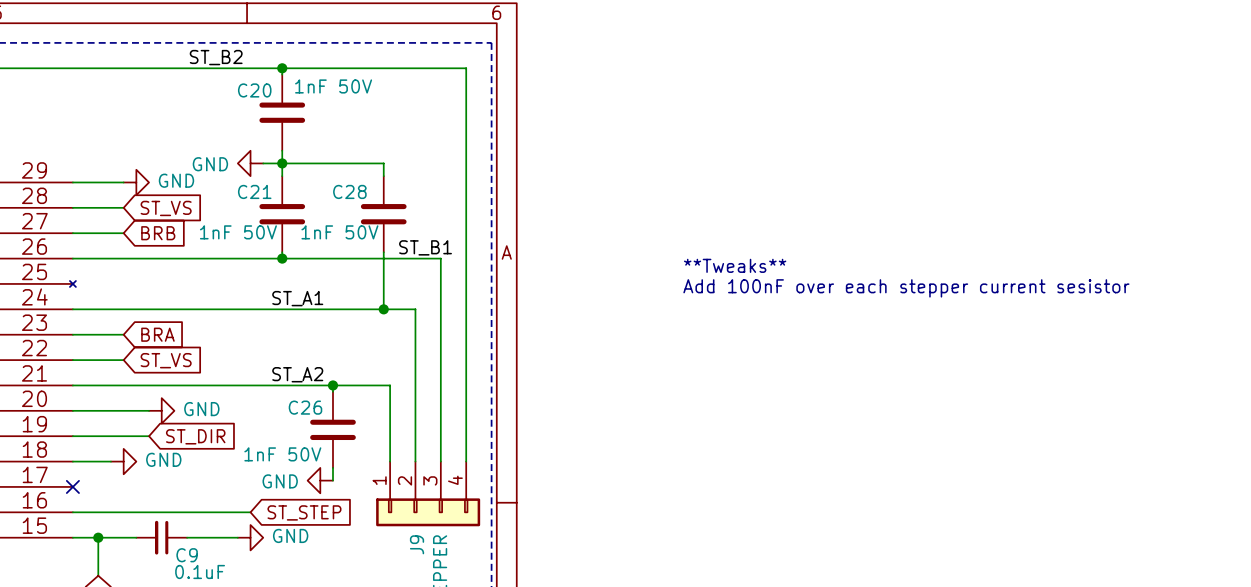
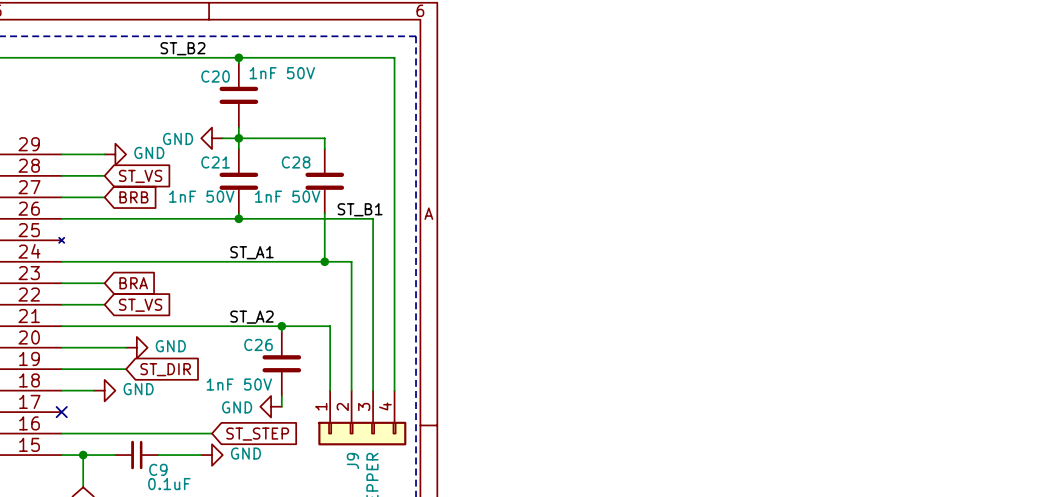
text: **Tweaks** (735, 265) -> none
text: Add 100nF over each stepper current sesistor (906, 288) -> none

